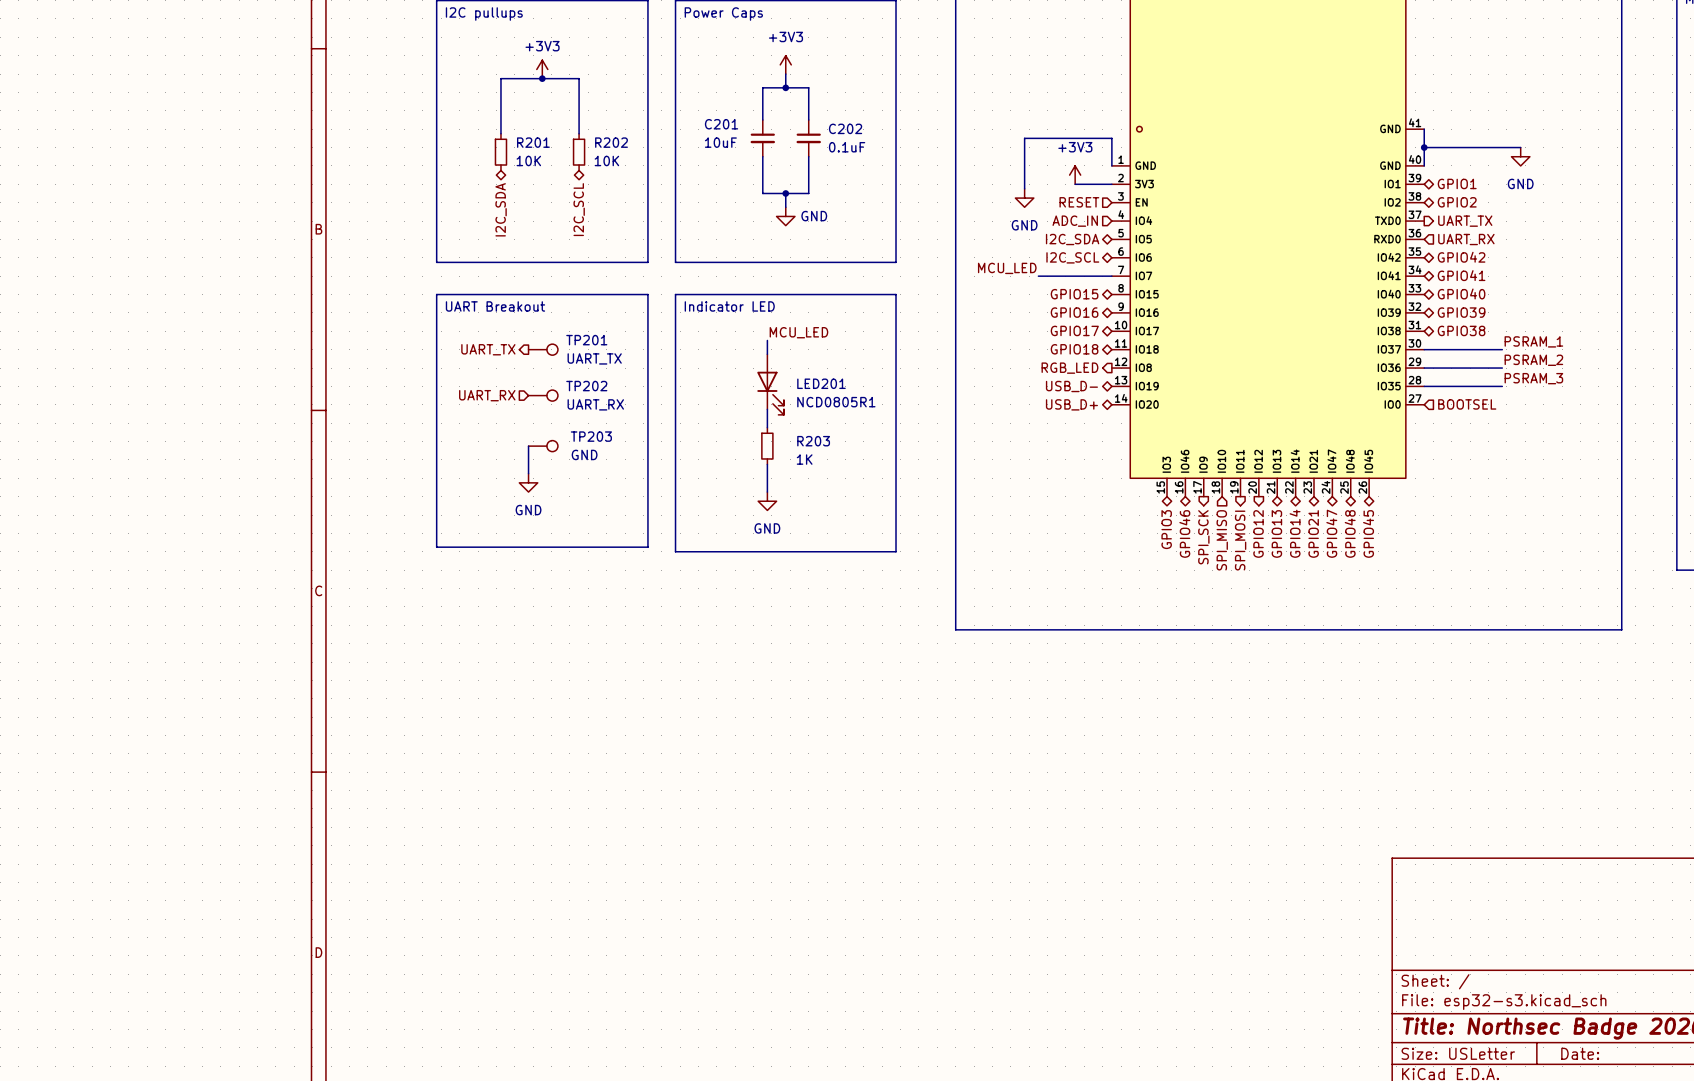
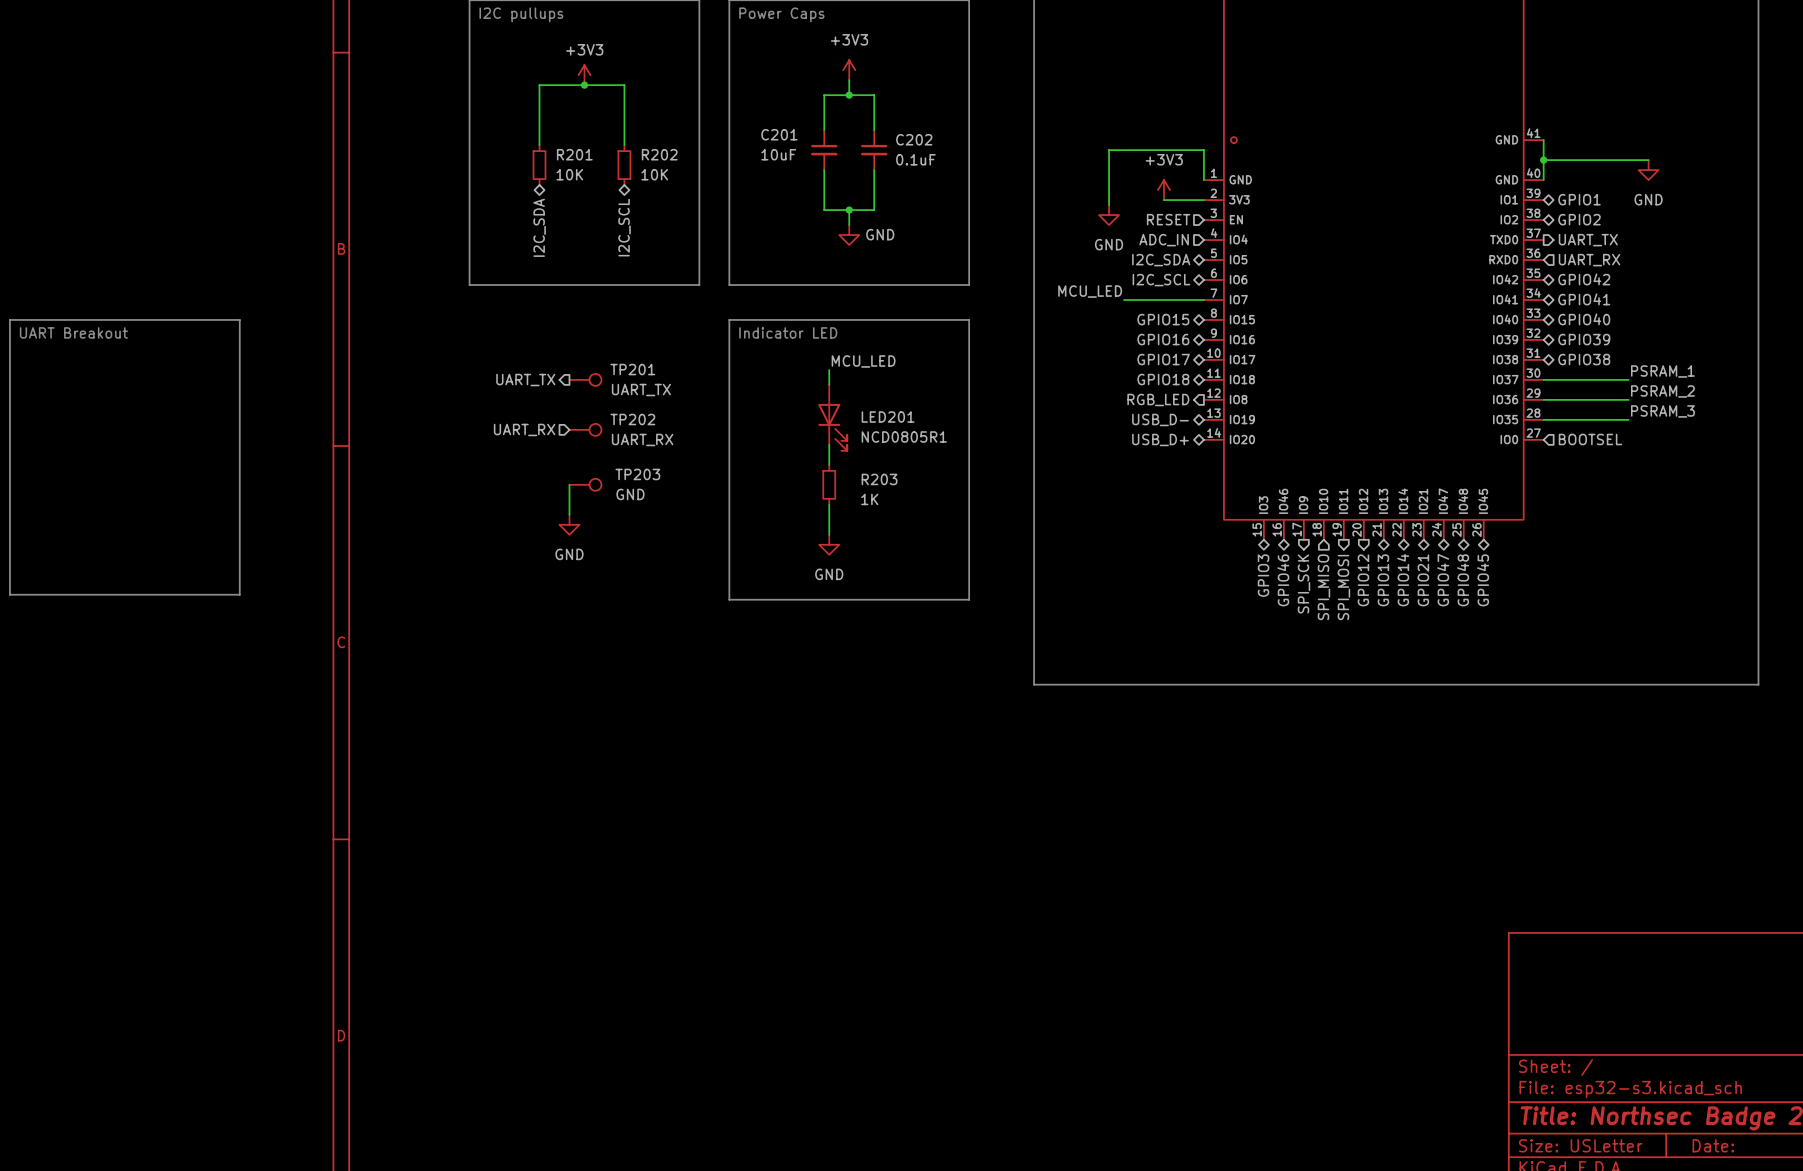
line: none -> (9, 319) (239, 319) (239, 594) (9, 594) (9, 319)
line: (436, 294) (647, 294) (647, 547) (436, 547) (436, 294) -> none
text: none -> UART Breakout (73, 332)
text: UART Breakout (495, 306) -> none

